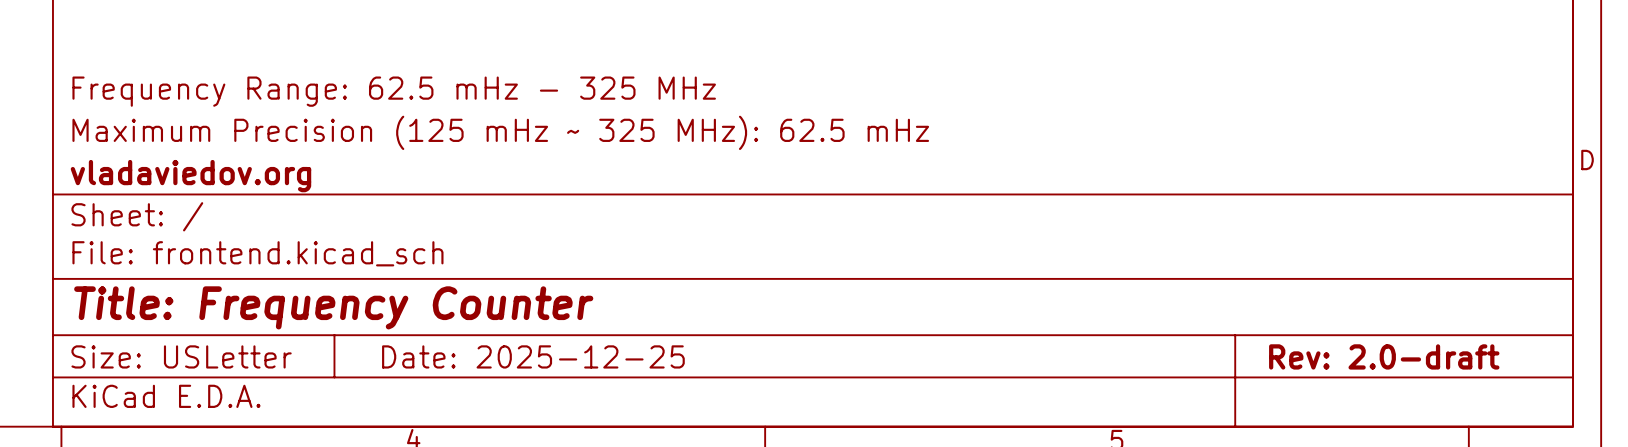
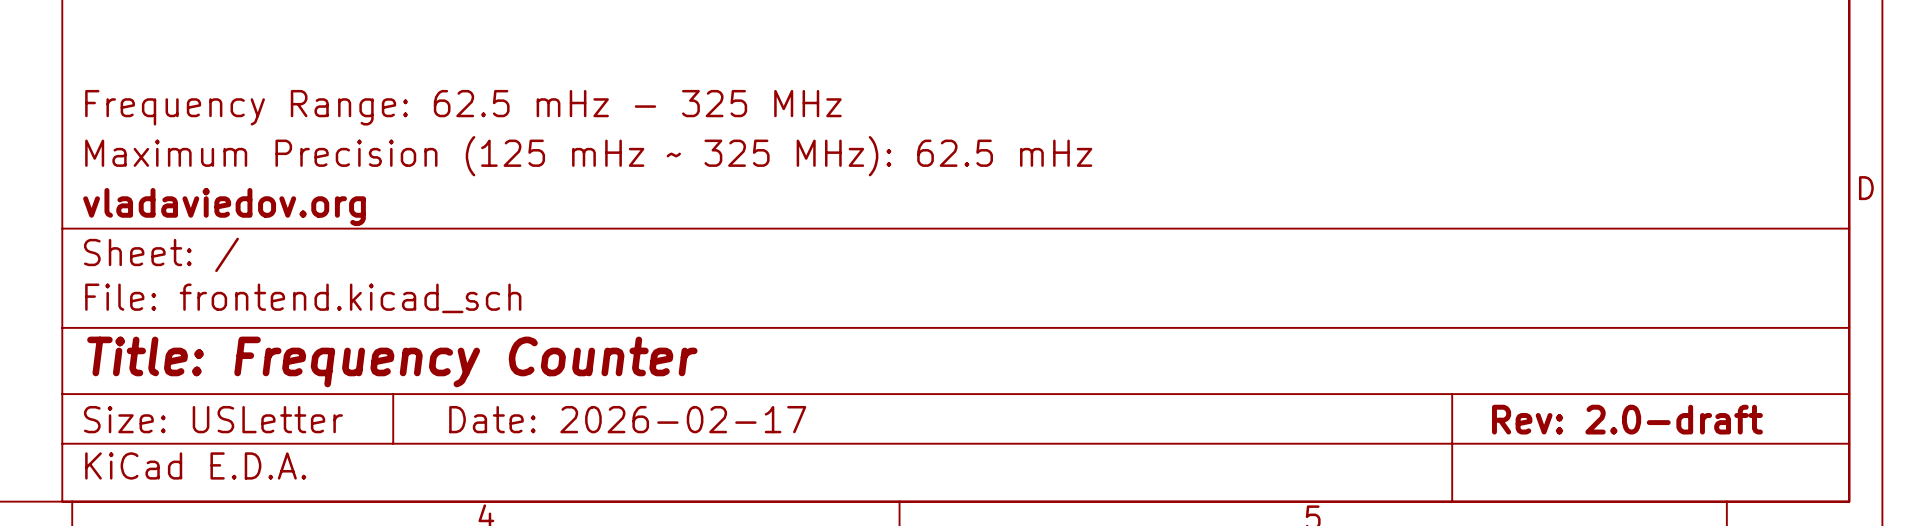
title block: Date: 2025-12-25 (533, 356) -> Date: 2026-02-17 (627, 419)

